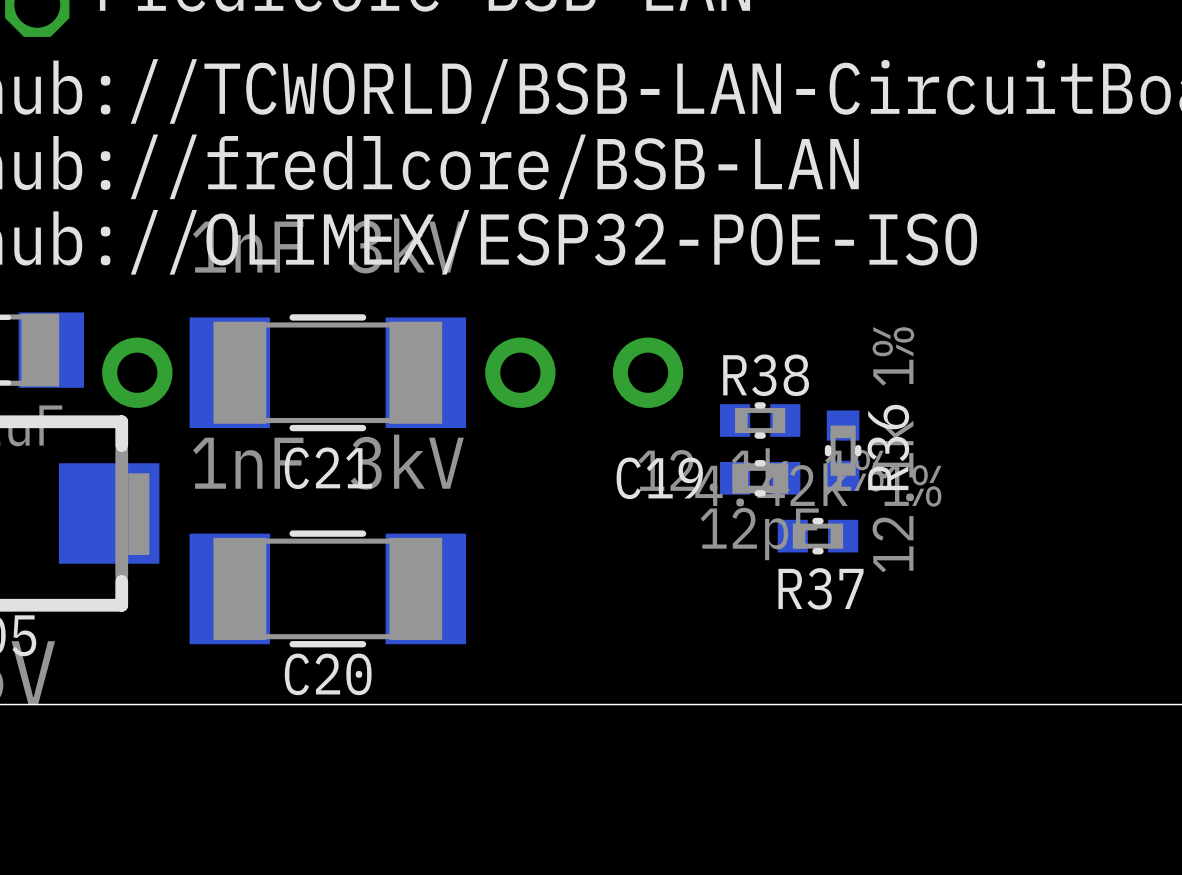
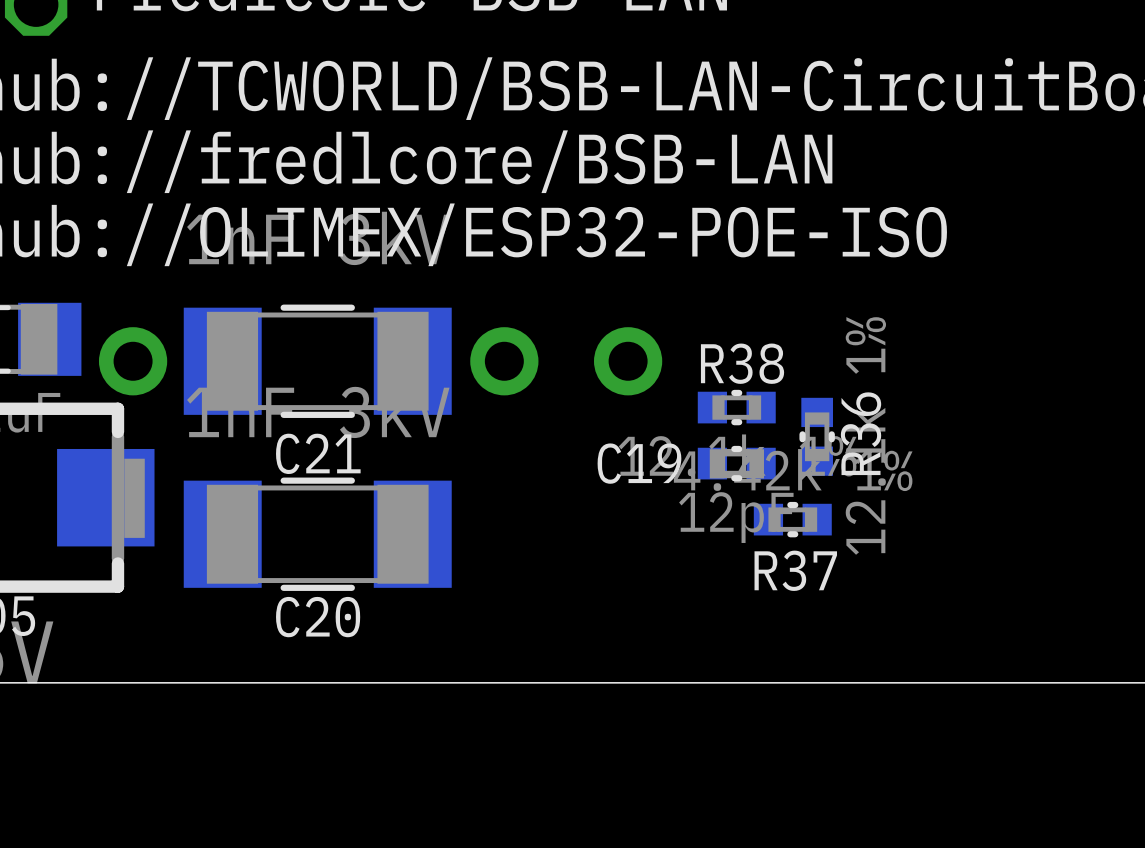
C20 position: (327, 588) -> (317, 534)

